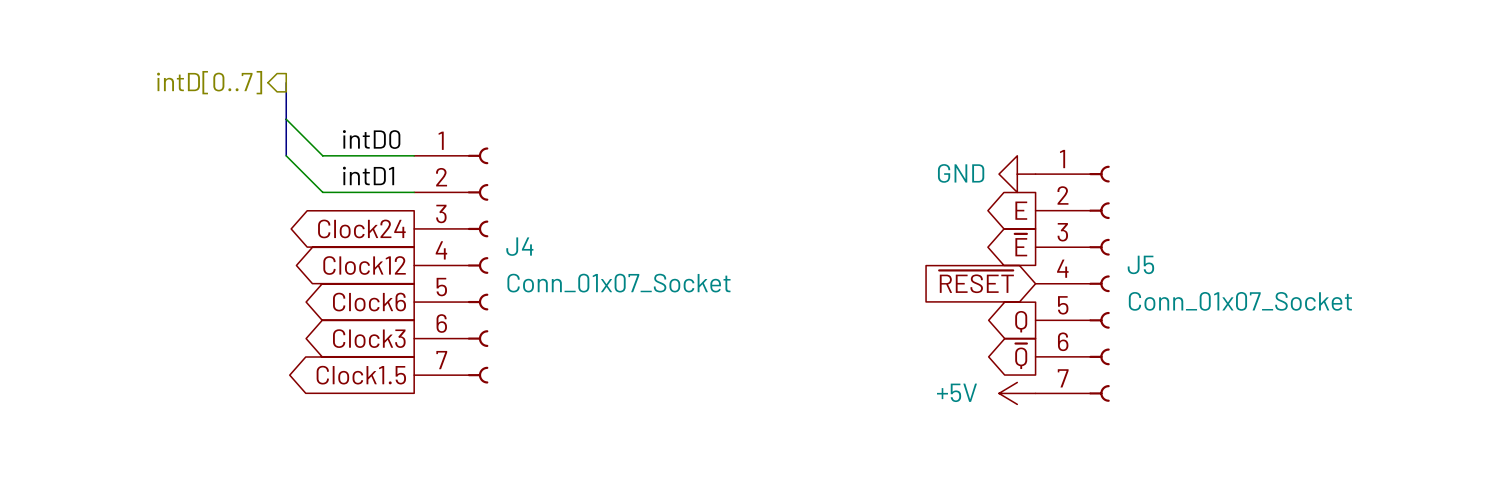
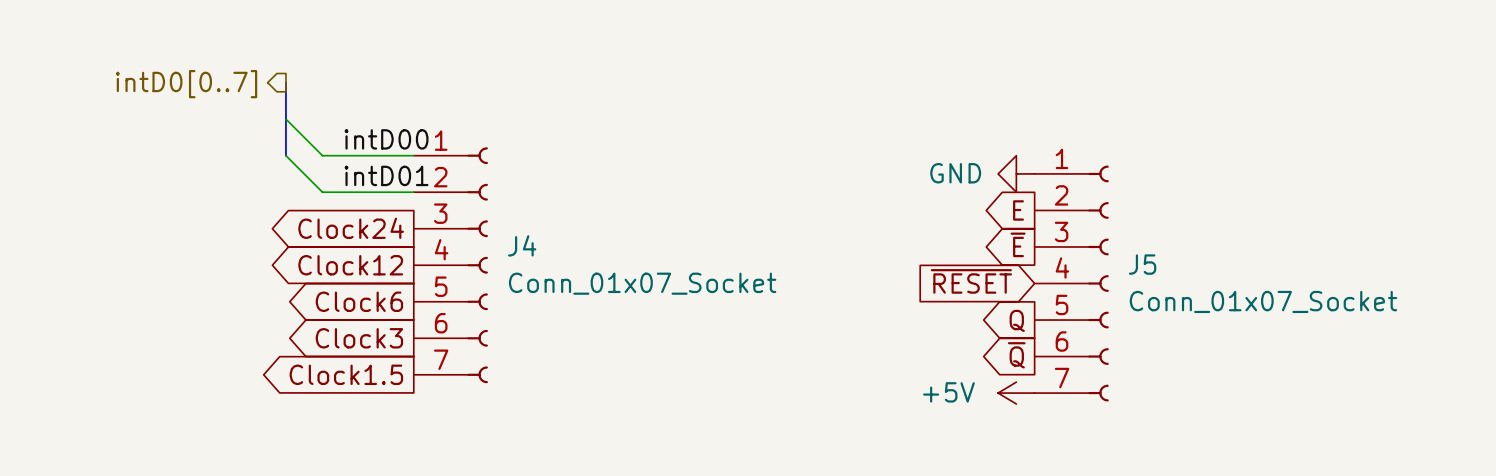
hierarchical label: intD[0..7] (209, 82) -> intD0[0..7] (186, 84)
label: intD0 (371, 139) -> intD00 (386, 139)
label: intD1 (368, 175) -> intD01 (386, 175)

